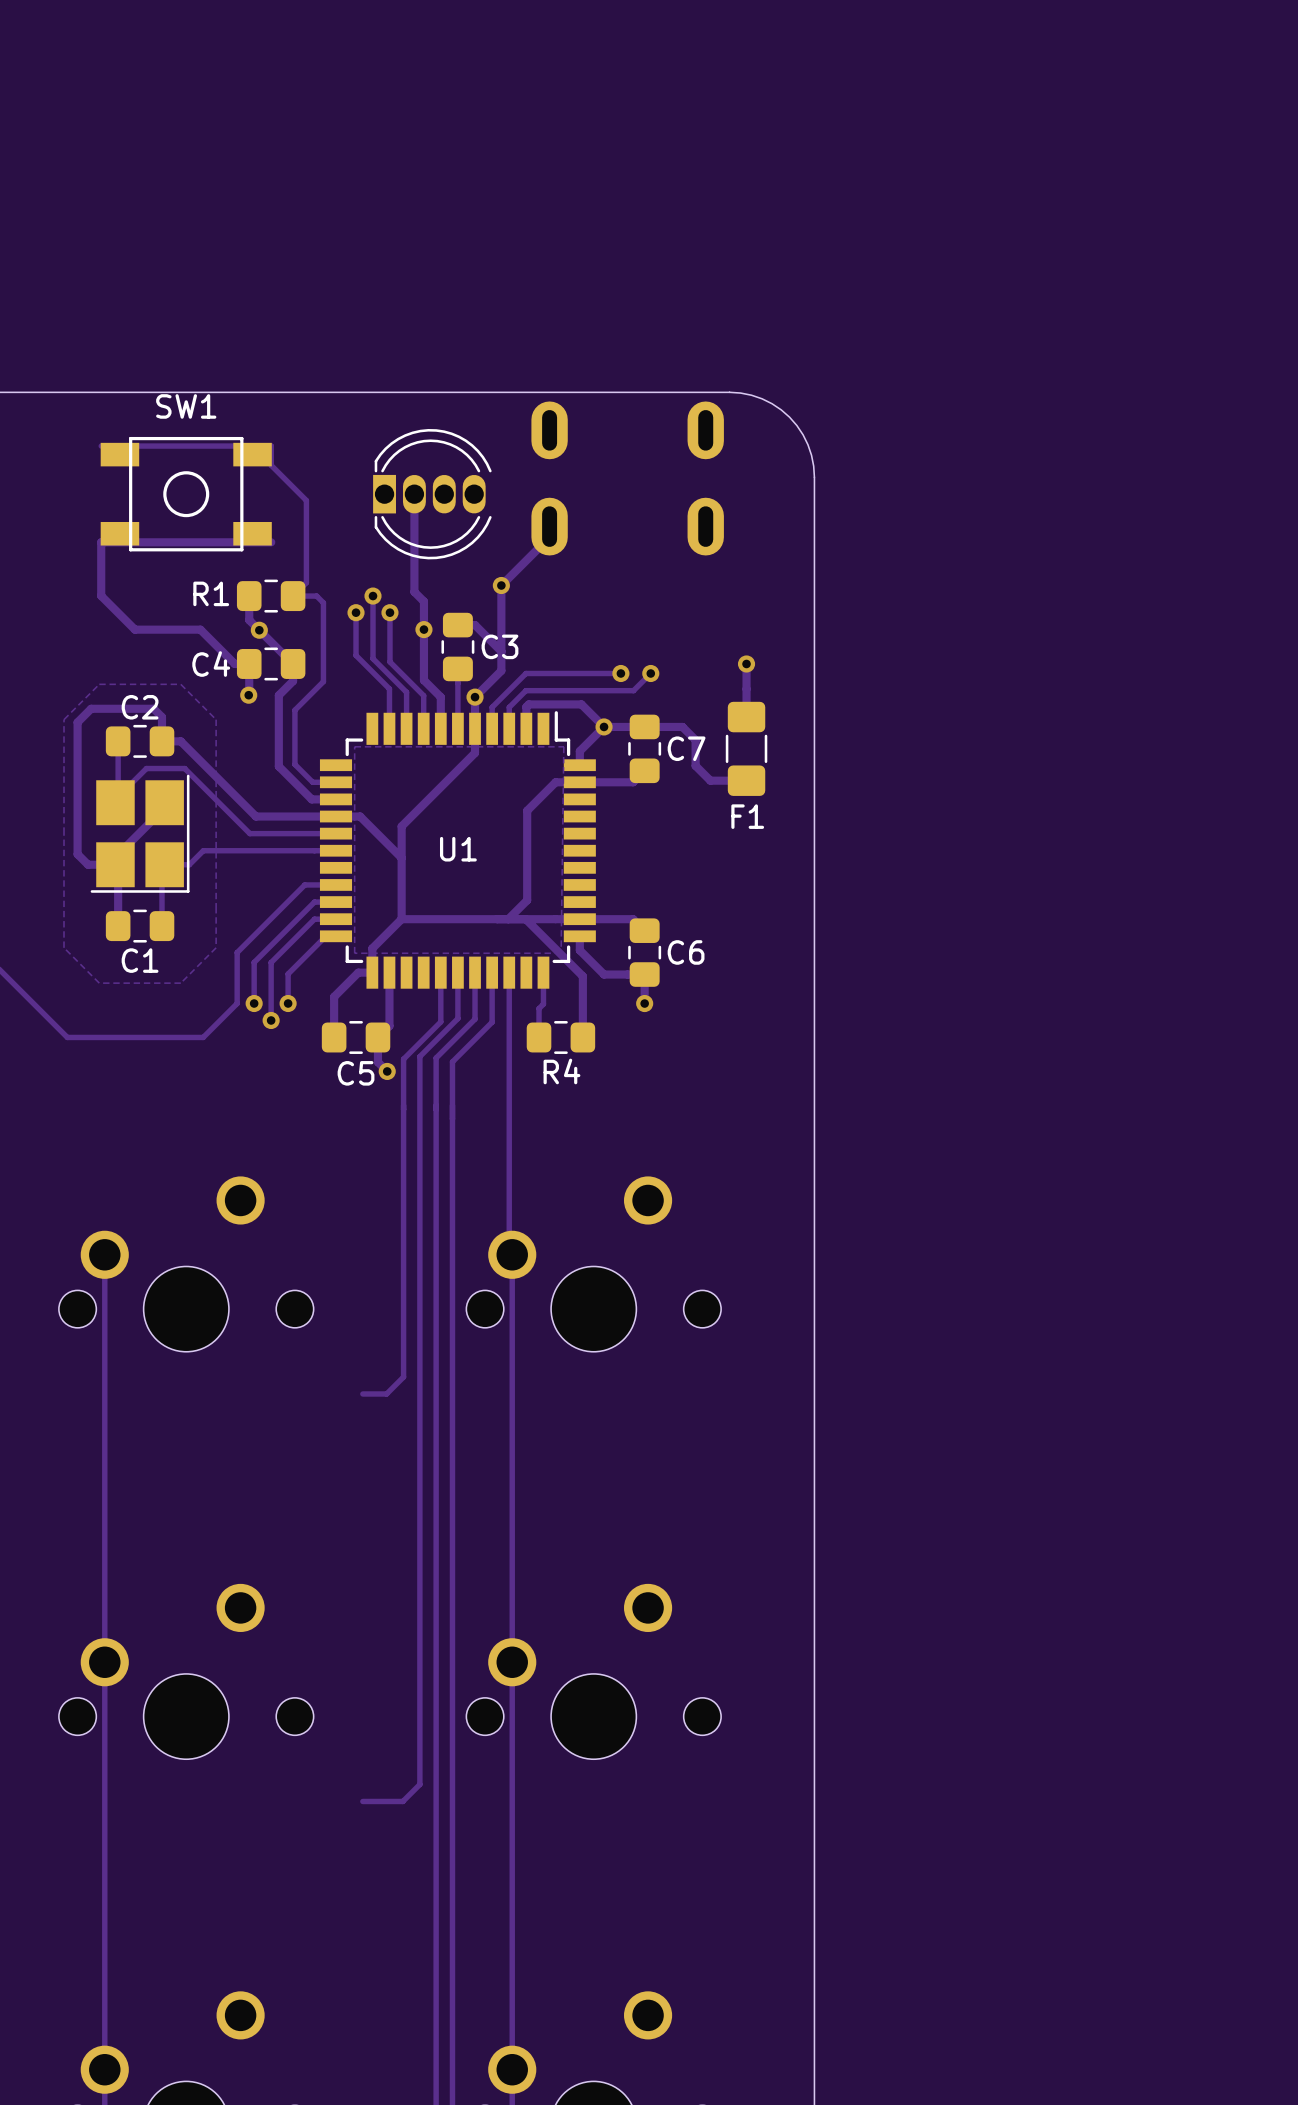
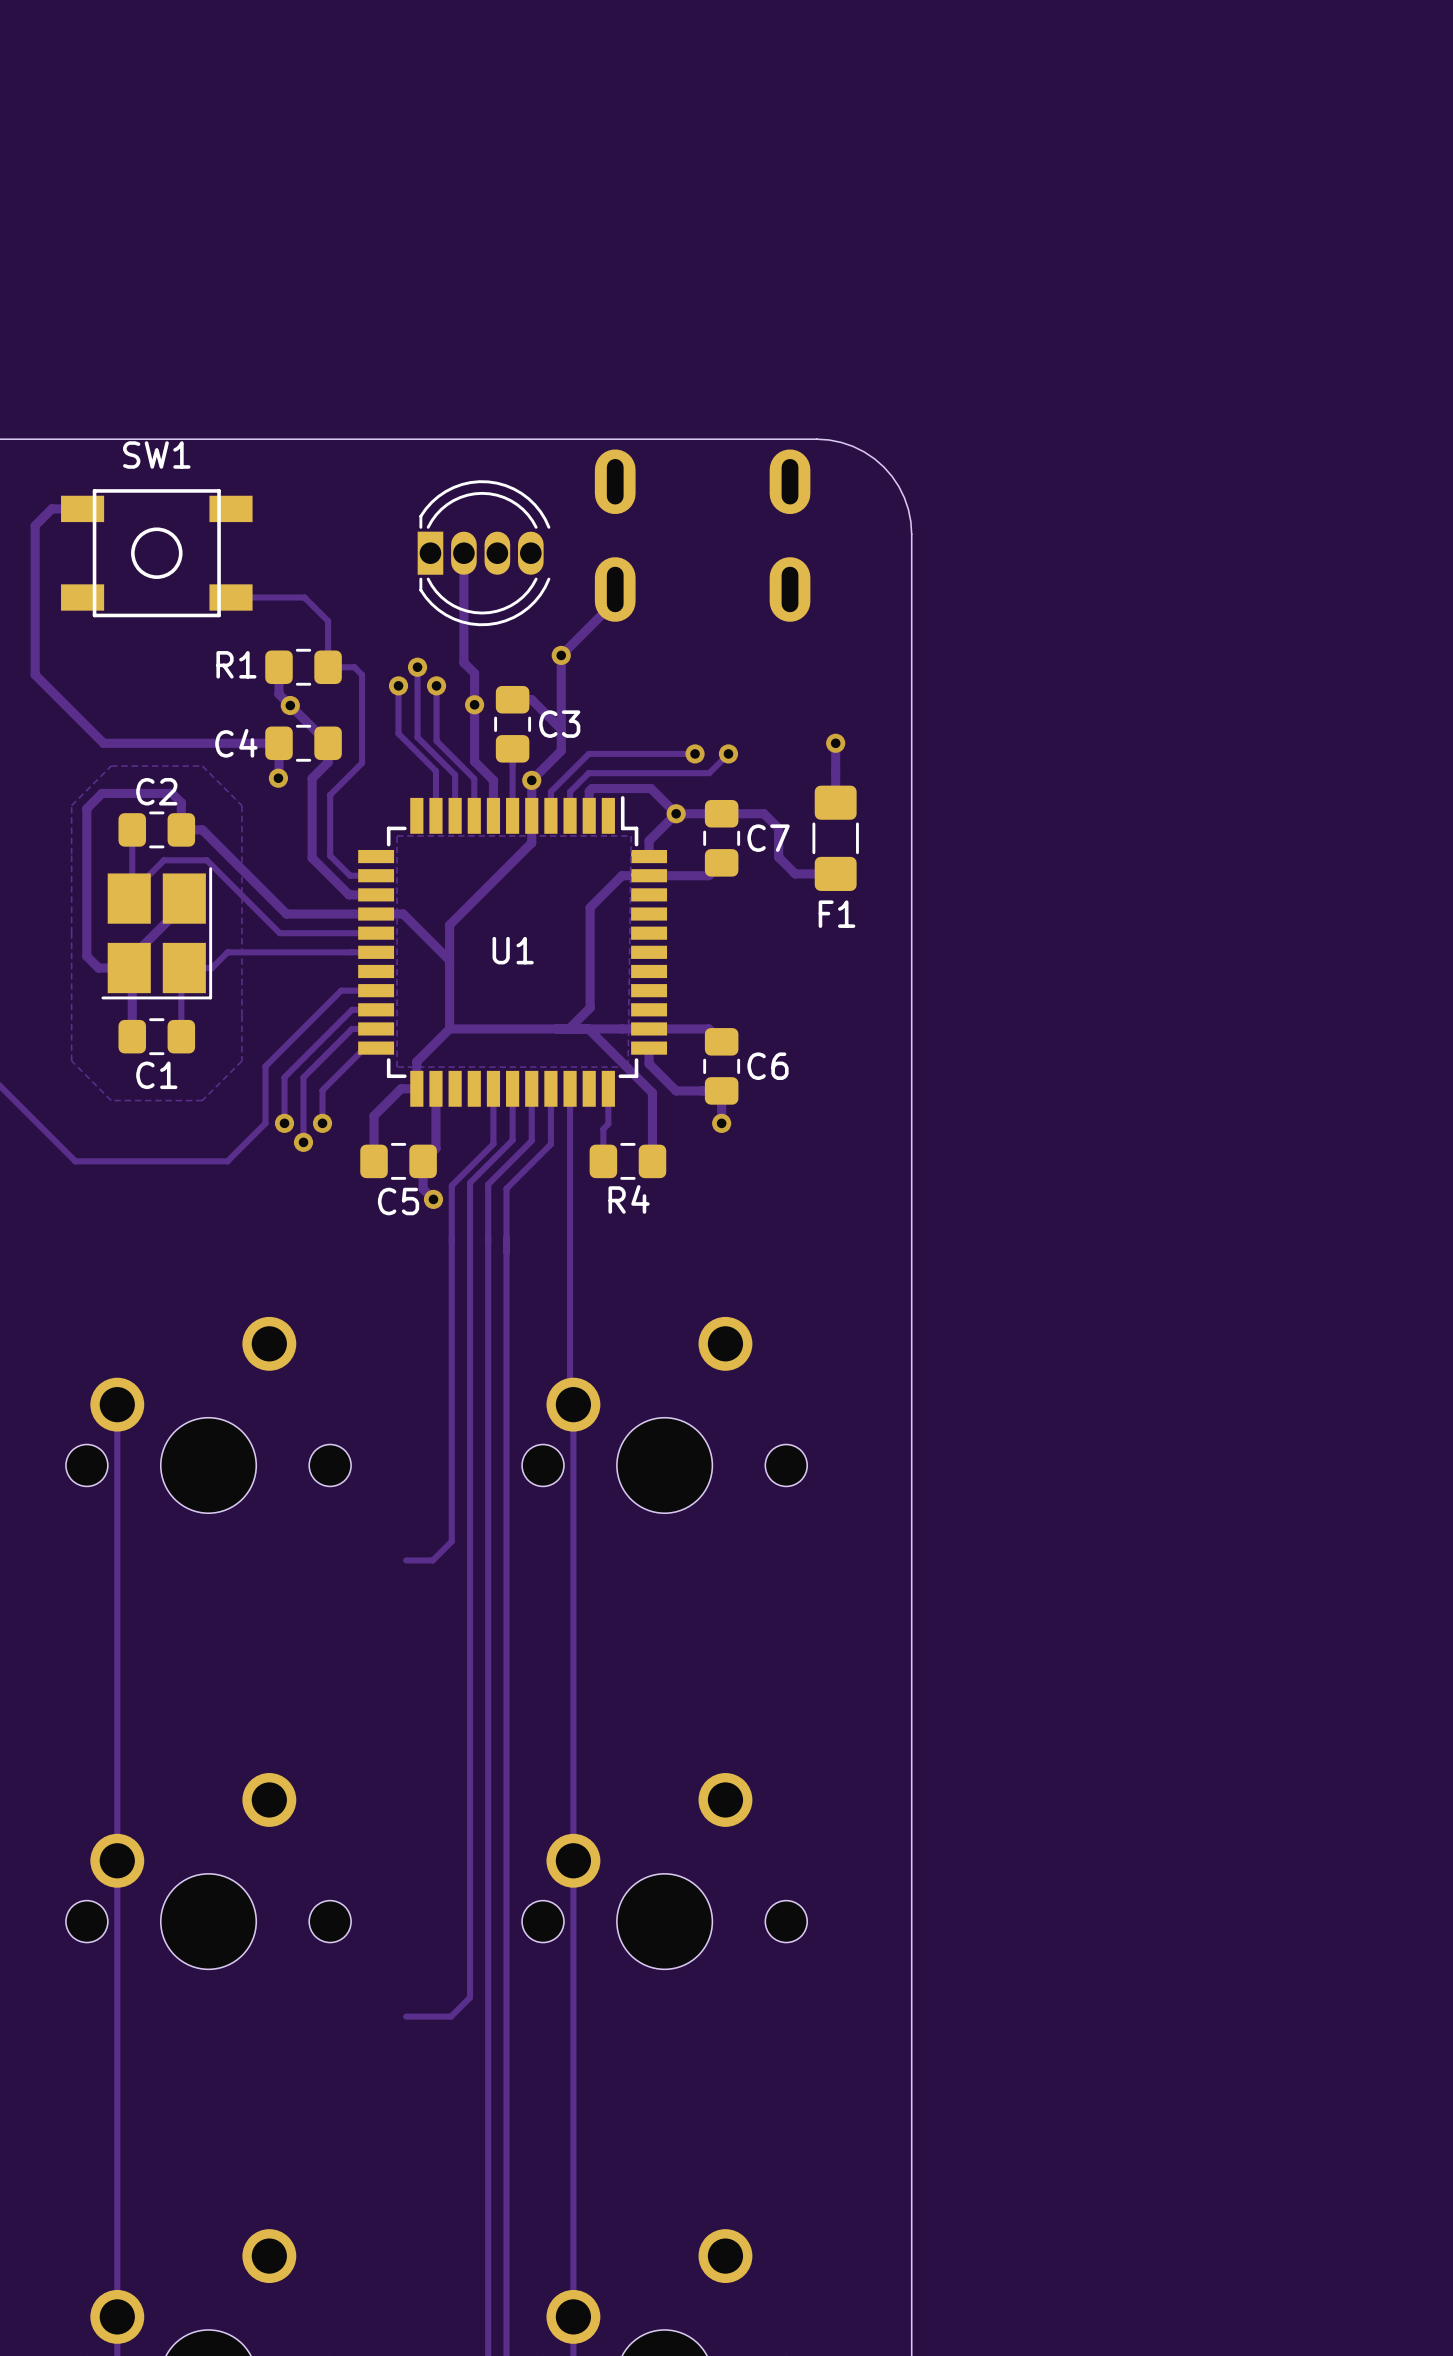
track: (101, 446) (271, 446) (271, 465) (306, 500) (306, 582) (293, 596) -> (231, 597) (304, 597) (328, 621) (328, 667)
SW1 position: (186, 494) -> (156, 553)
track: (271, 542) (101, 542) (101, 595) (134, 629) (200, 629) (234, 663) -> (82, 508) (51, 508) (35, 525) (35, 674) (103, 743) (262, 743)

